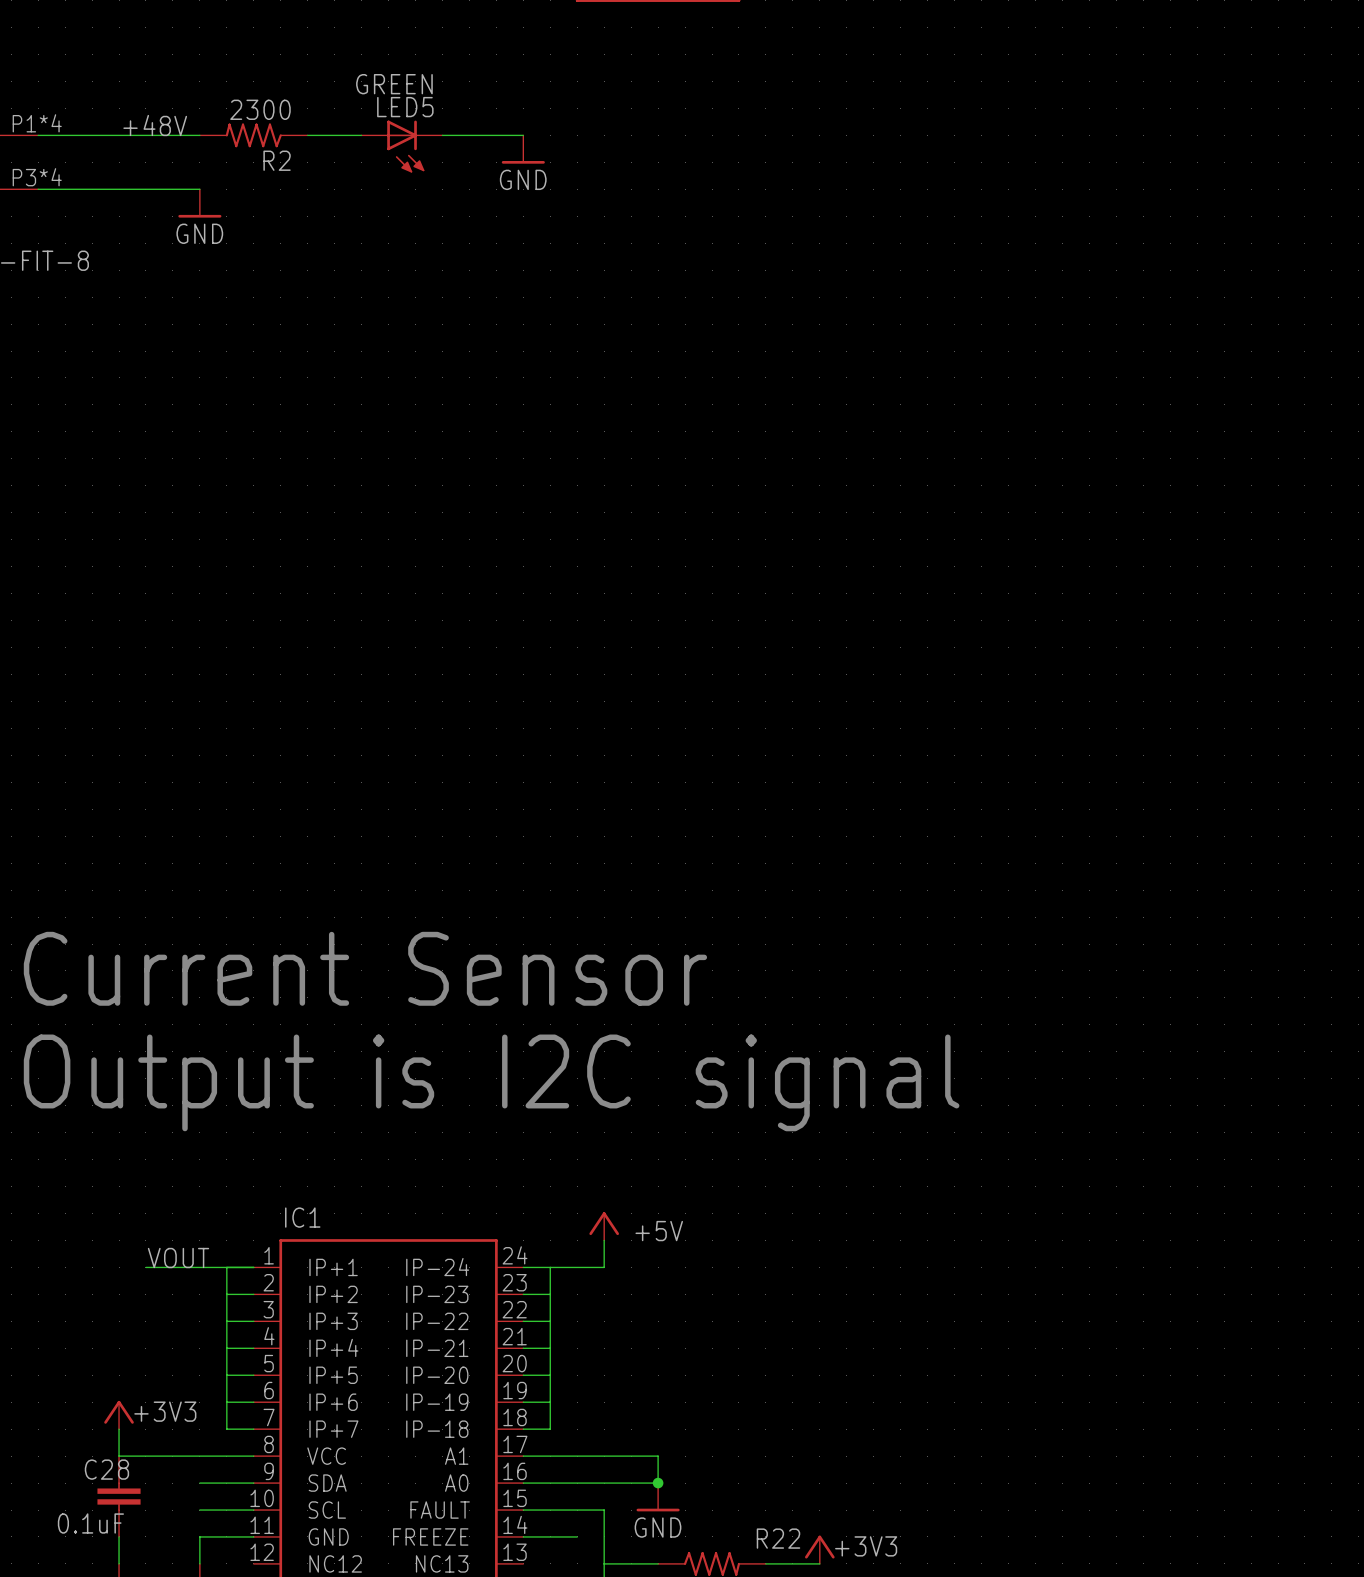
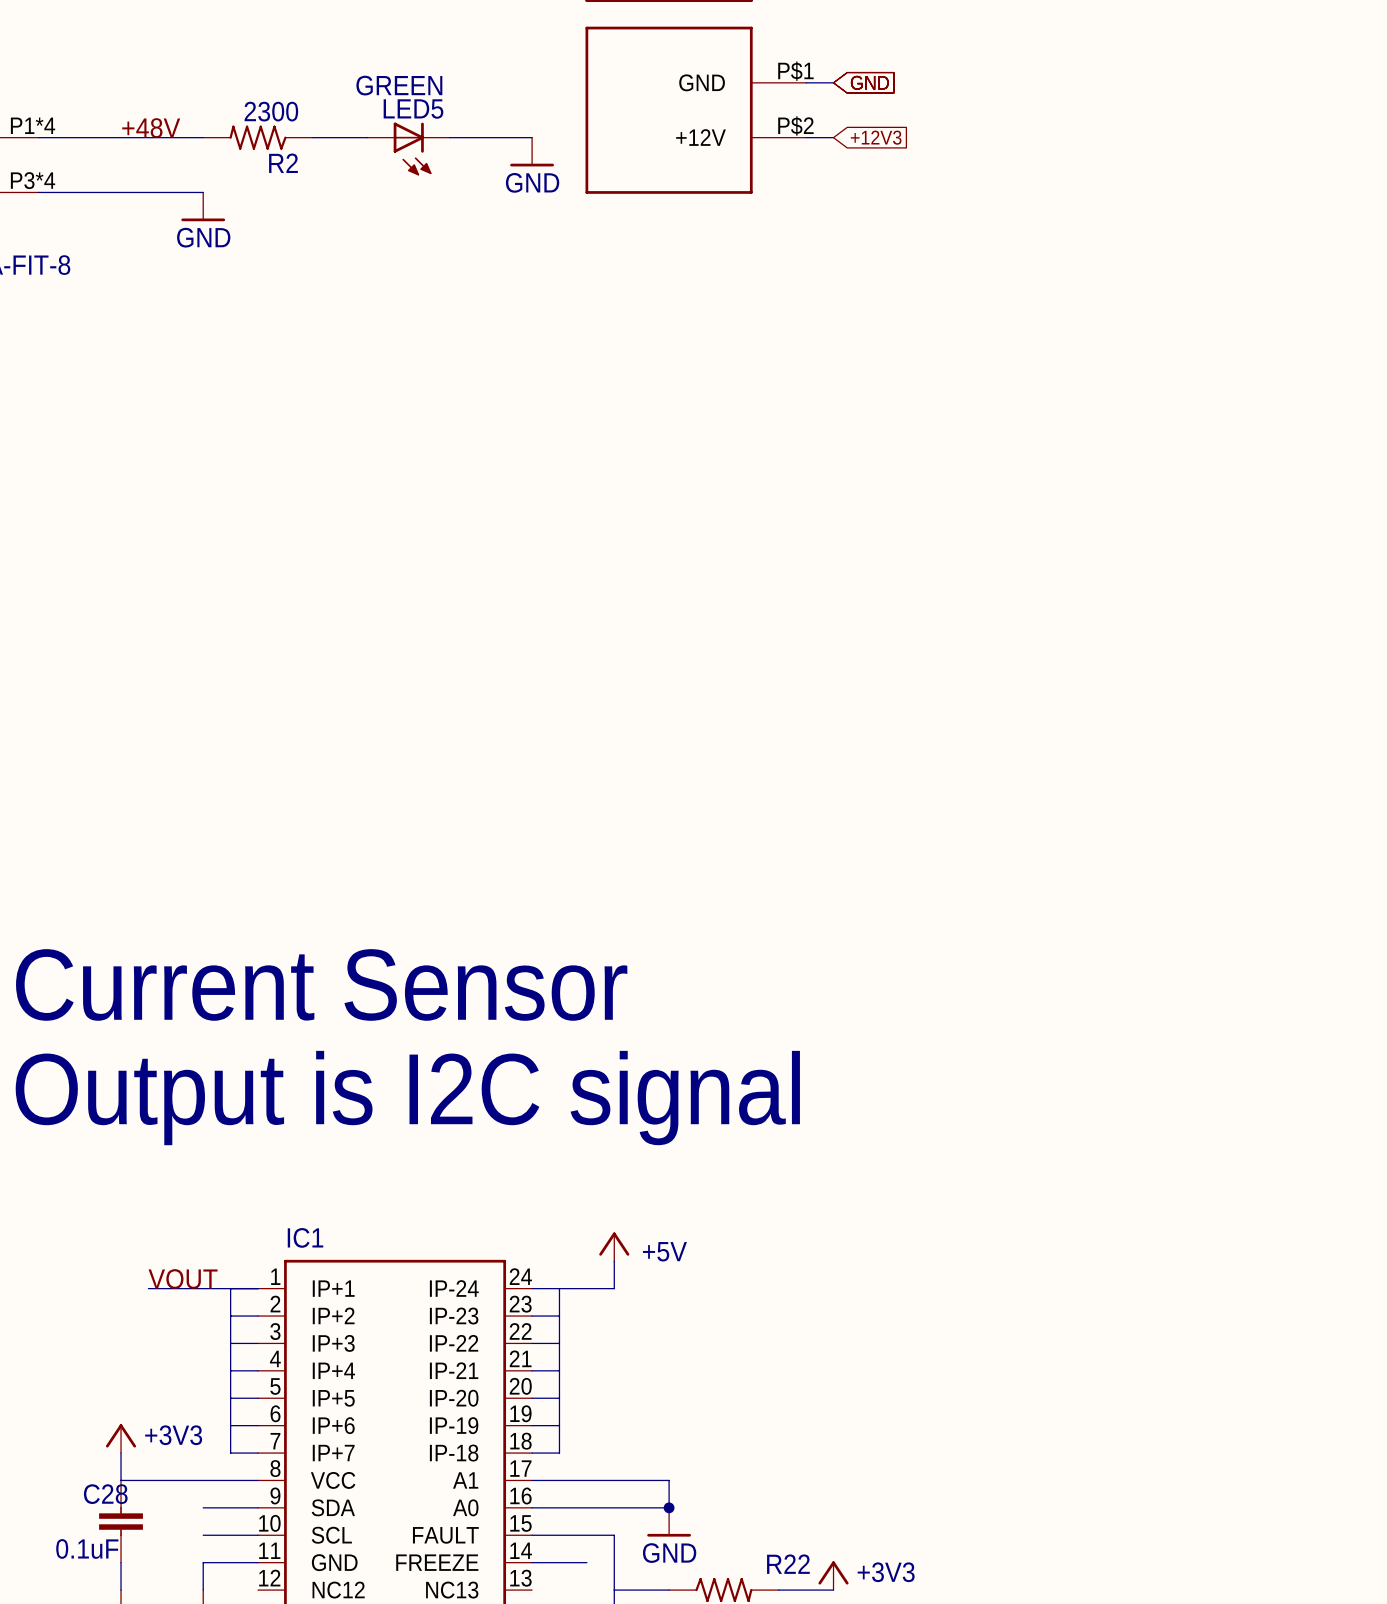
wire: none -> (806, 82) (833, 82)
global label: none -> GND (869, 82)
part: none -> (695, 110)
wire: none -> (806, 137) (833, 137)
global label: none -> +12V3 (876, 137)

